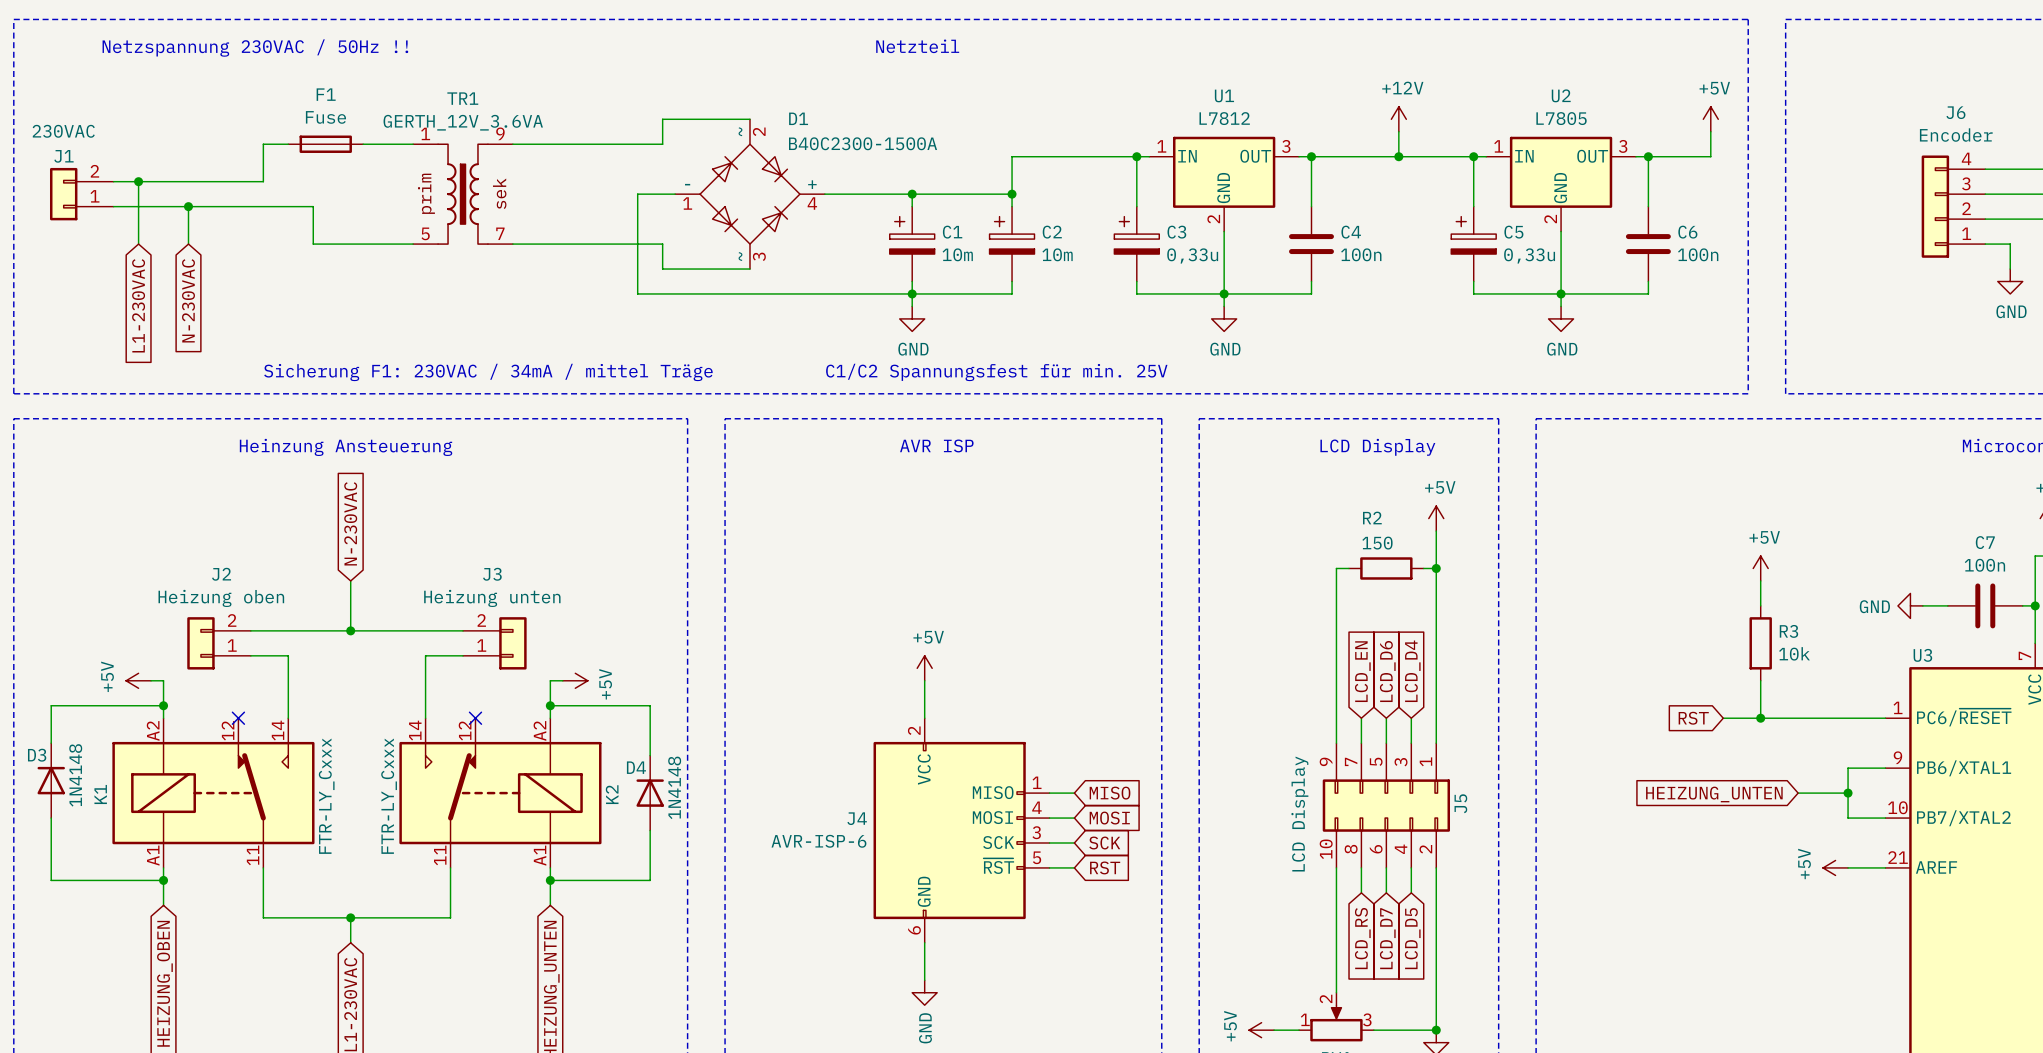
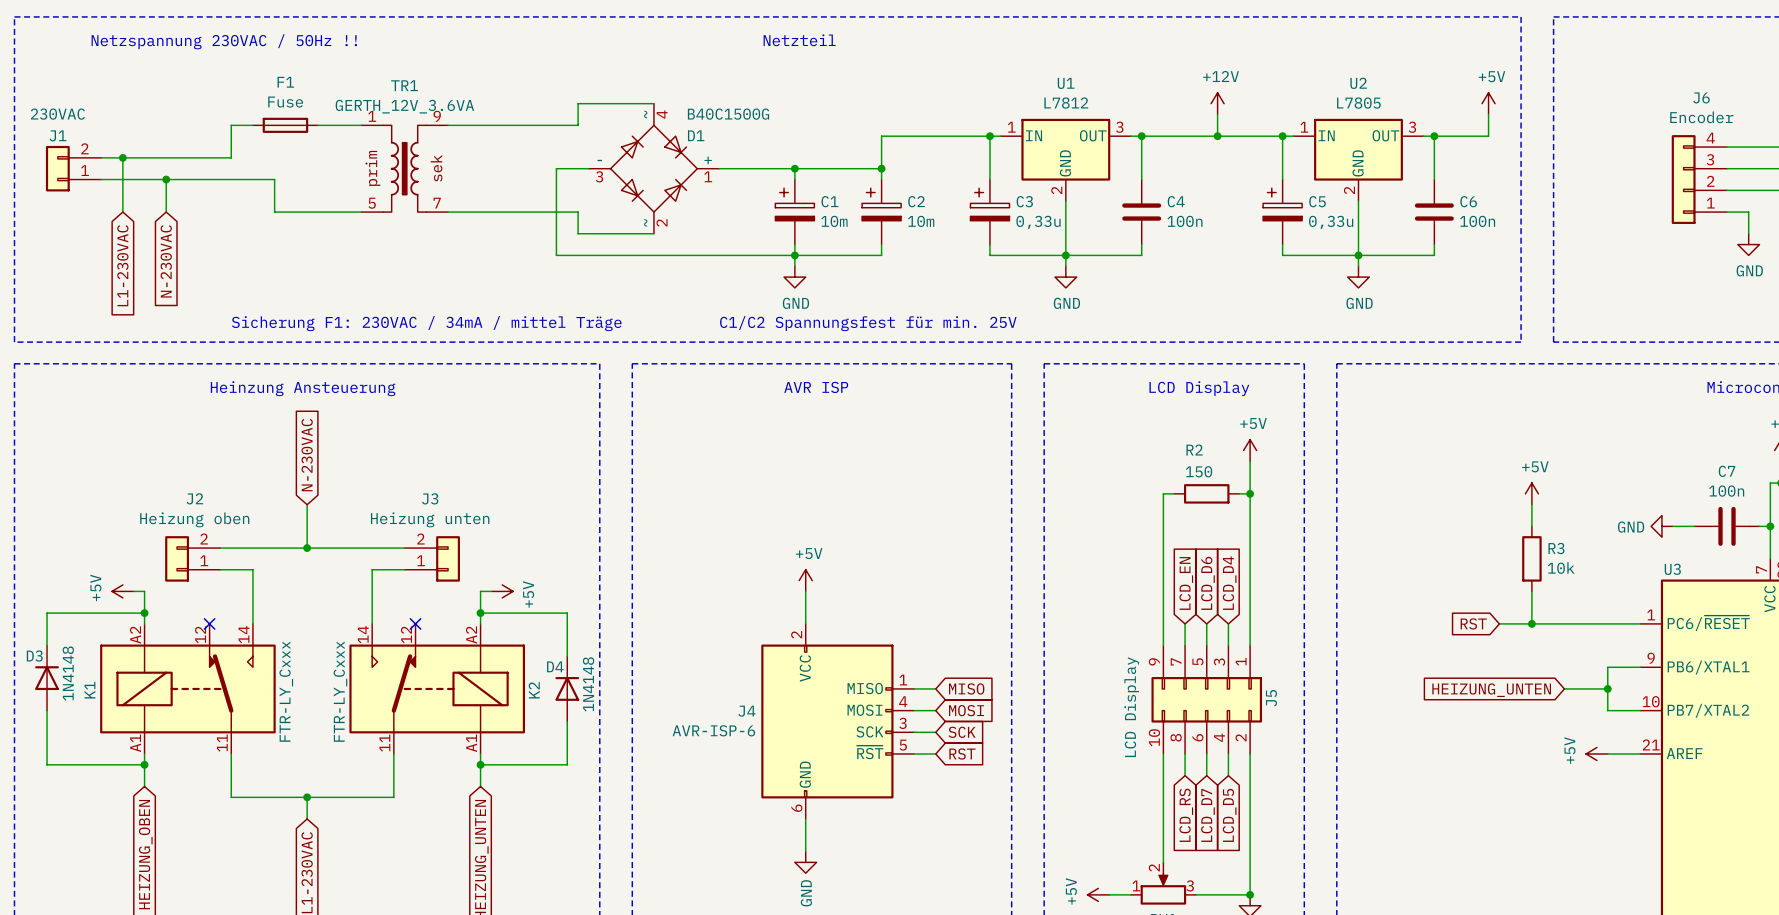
D1 name position: D1 (798, 118) -> D1 (696, 135)
D1 pin number: 2 (759, 131) -> 4 (662, 114)
D1 value: B40C2300-1500A (863, 143) -> B40C1500G (728, 114)
D1 pin number: 1 (687, 203) -> 3 (599, 176)
D1 pin number: 4 (812, 203) -> 1 (708, 176)
D1 pin number: 3 (759, 256) -> 2 (662, 222)

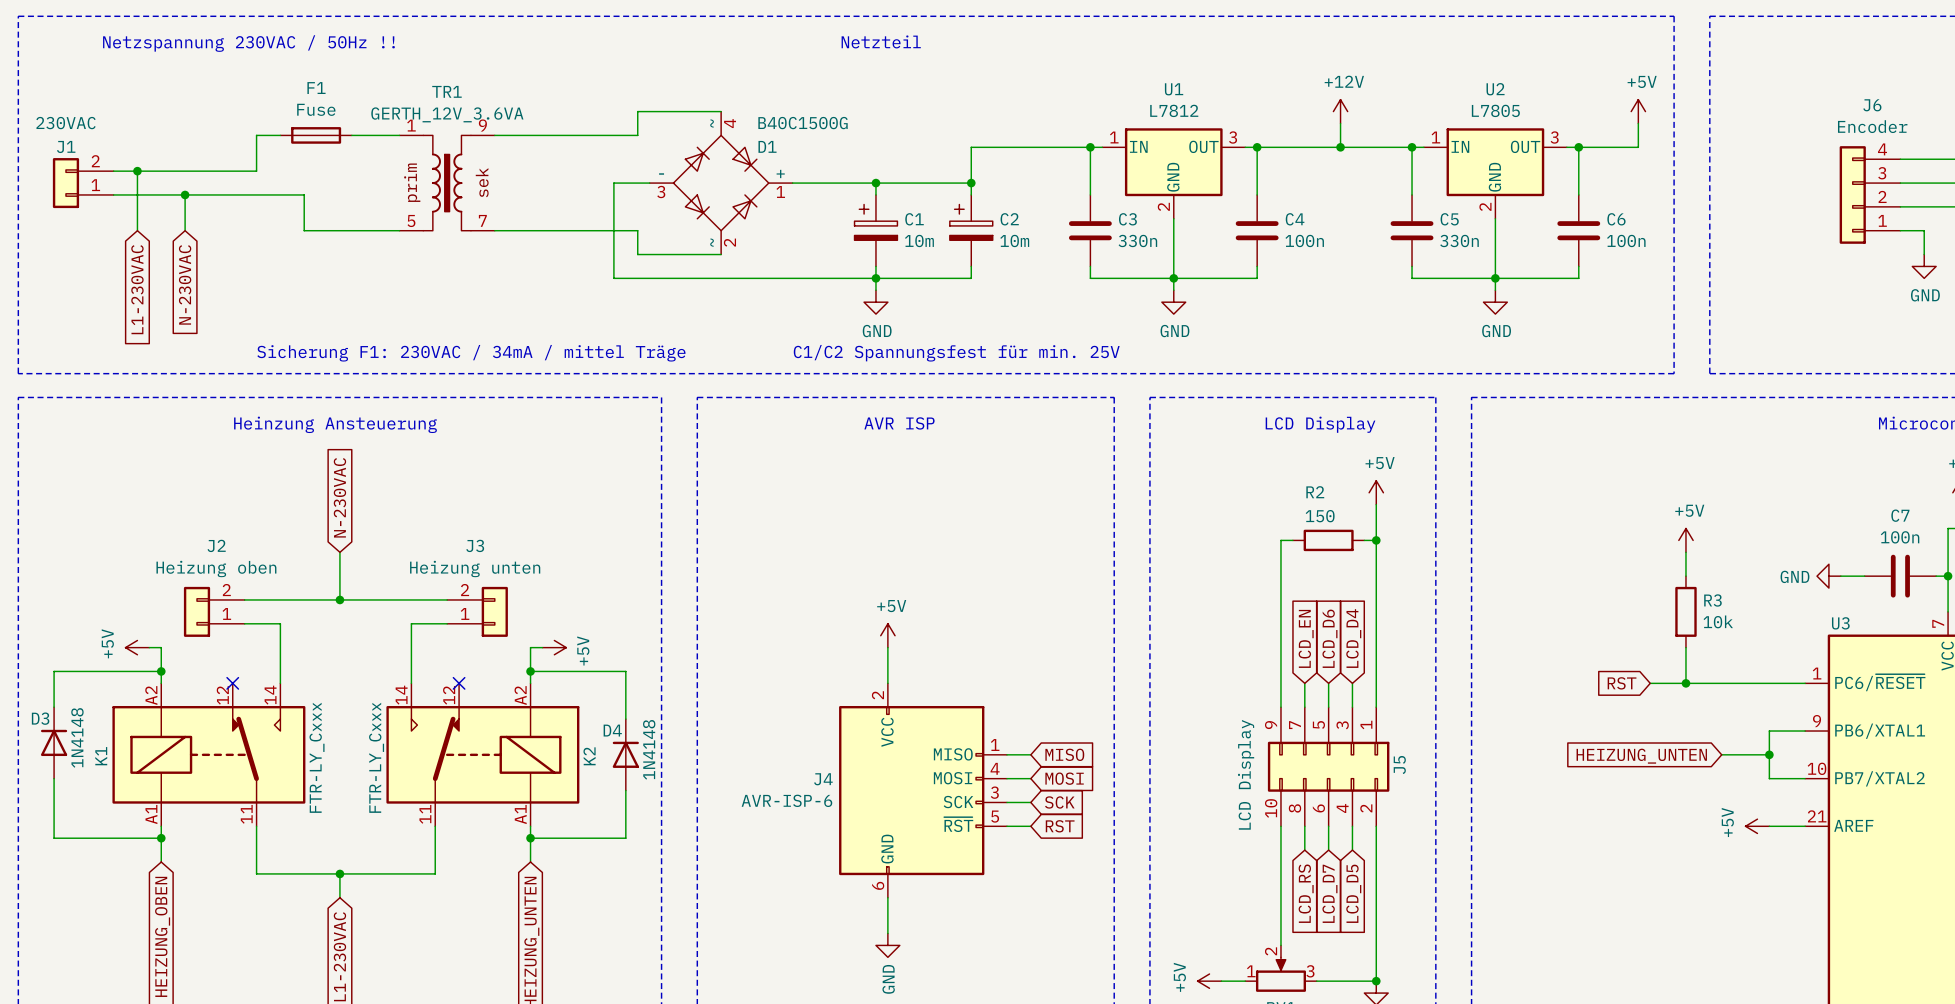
C3 symbol: [970, 179, 1010, 245] -> [1068, 194, 1112, 267]
C5 symbol: [1263, 179, 1303, 245] -> [1390, 194, 1434, 267]
C3 value: 0,33u (1038, 222) -> 330n (1137, 240)
C5 value: 0,33u (1331, 222) -> 330n (1459, 240)

